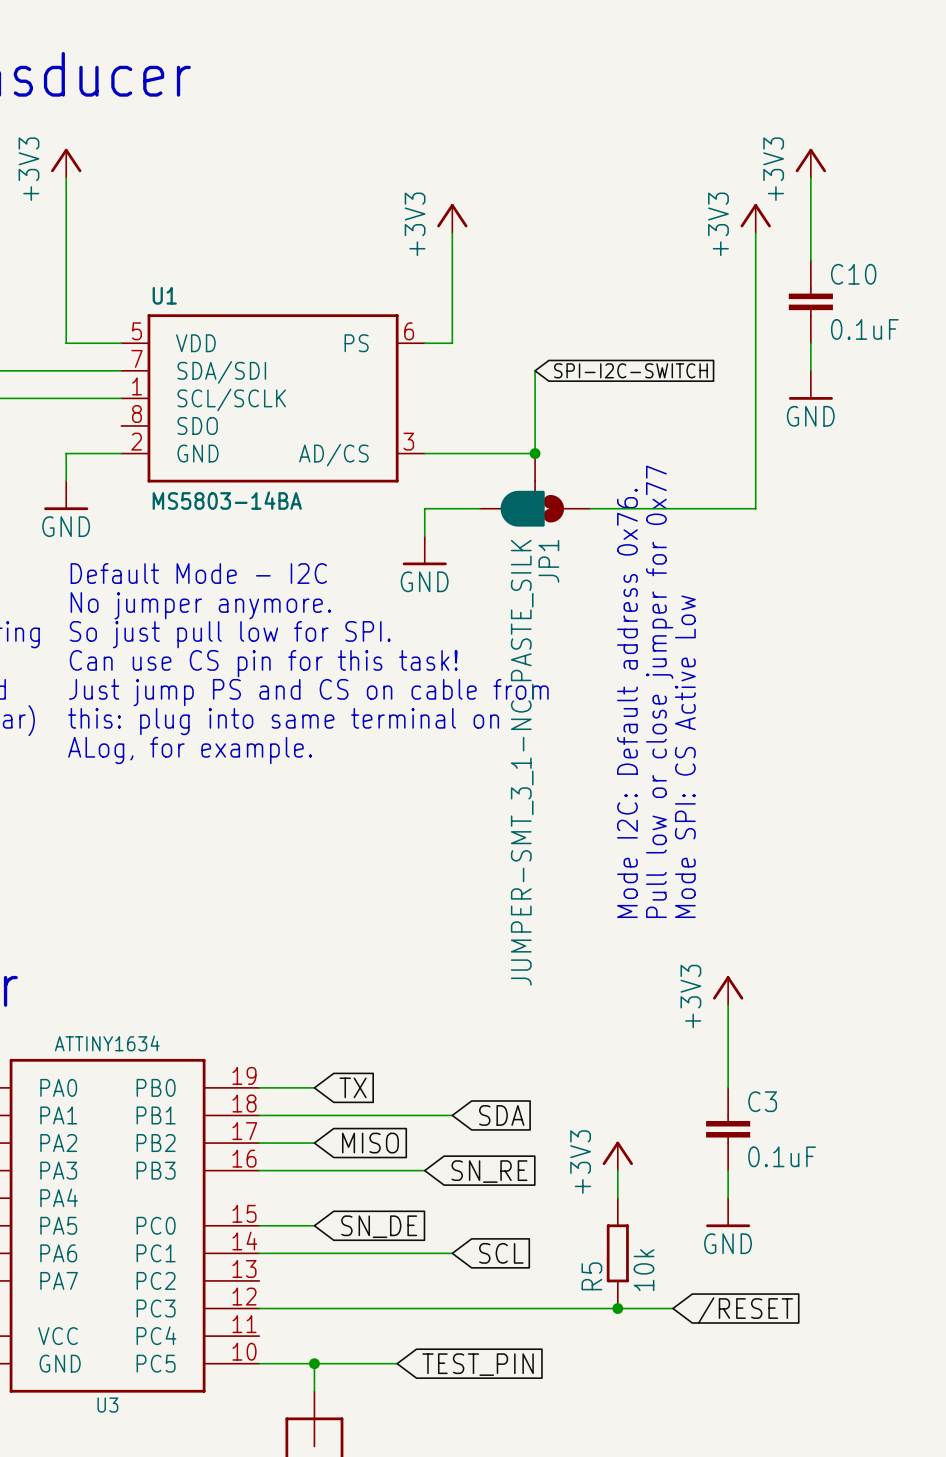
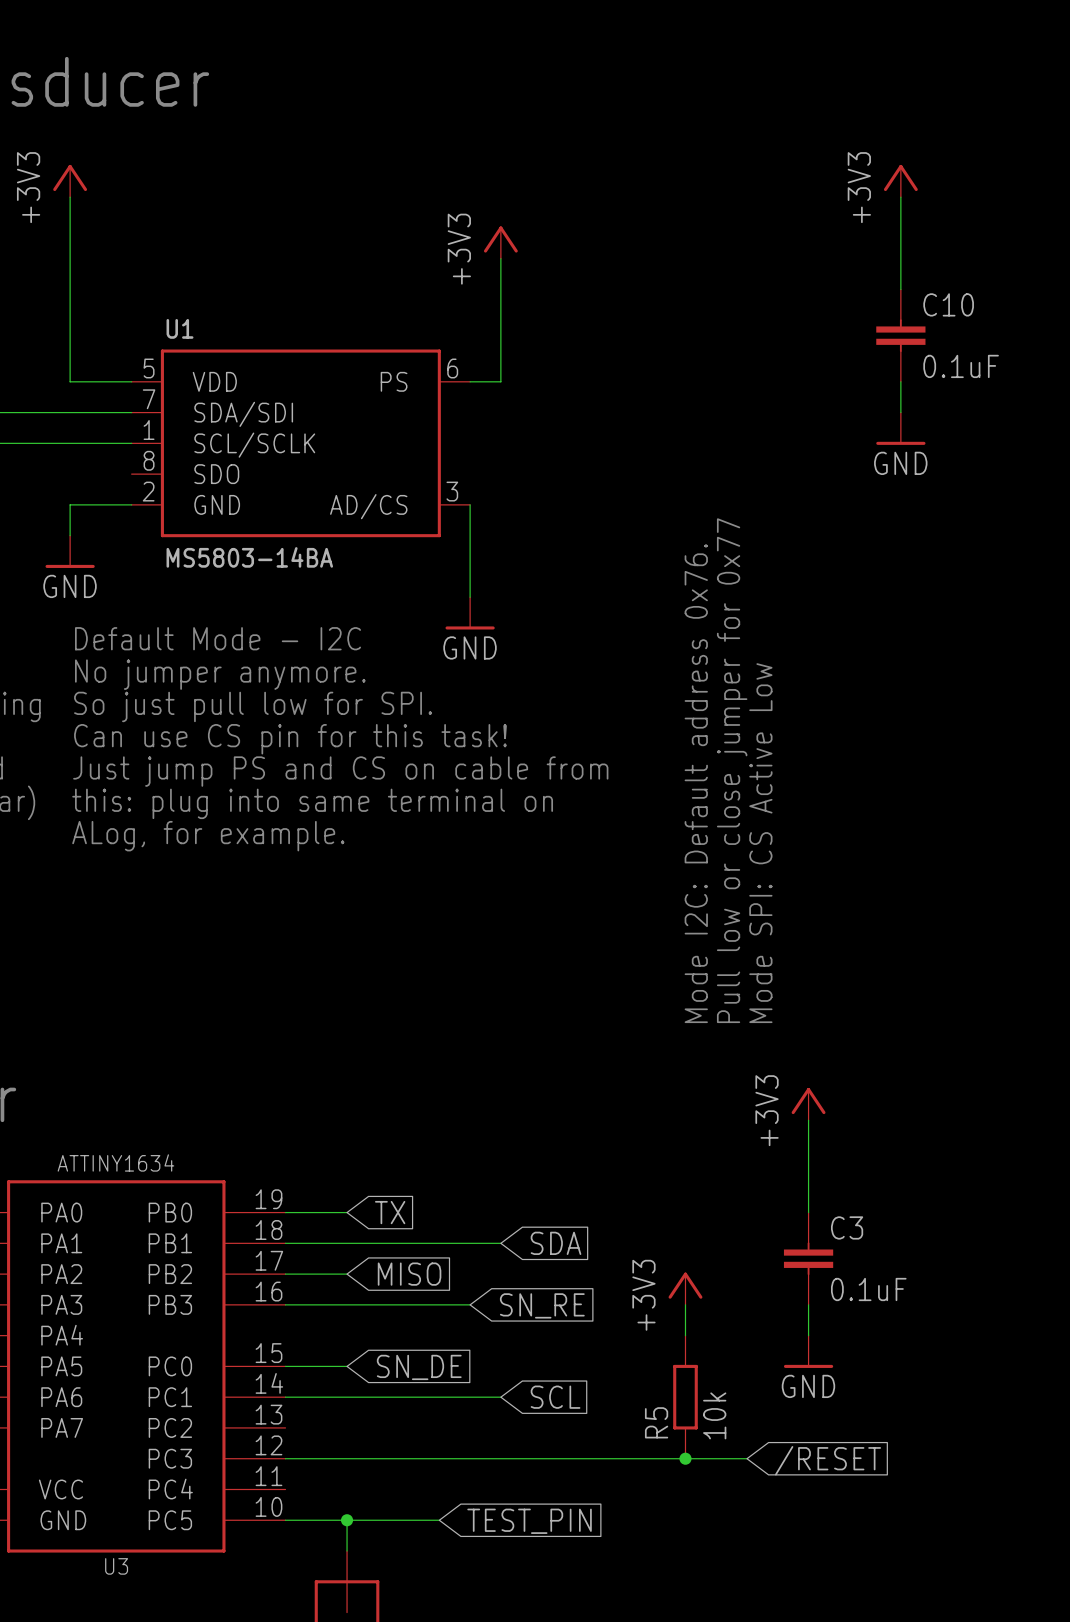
power symbol: +3V3 (755, 218) -> none
wire: (755, 232) (755, 508) (590, 508) -> none
wire: (535, 370) (535, 453) (424, 453) -> none
global label: SPI-I2C-SWITCH (630, 370) -> none
junction: (535, 453) -> none
JP1: JUMPER-SMT_3_1-NC_PASTE_SILK (535, 490) -> none
wire: (424, 508) (479, 508) -> (470, 566) (470, 504)

